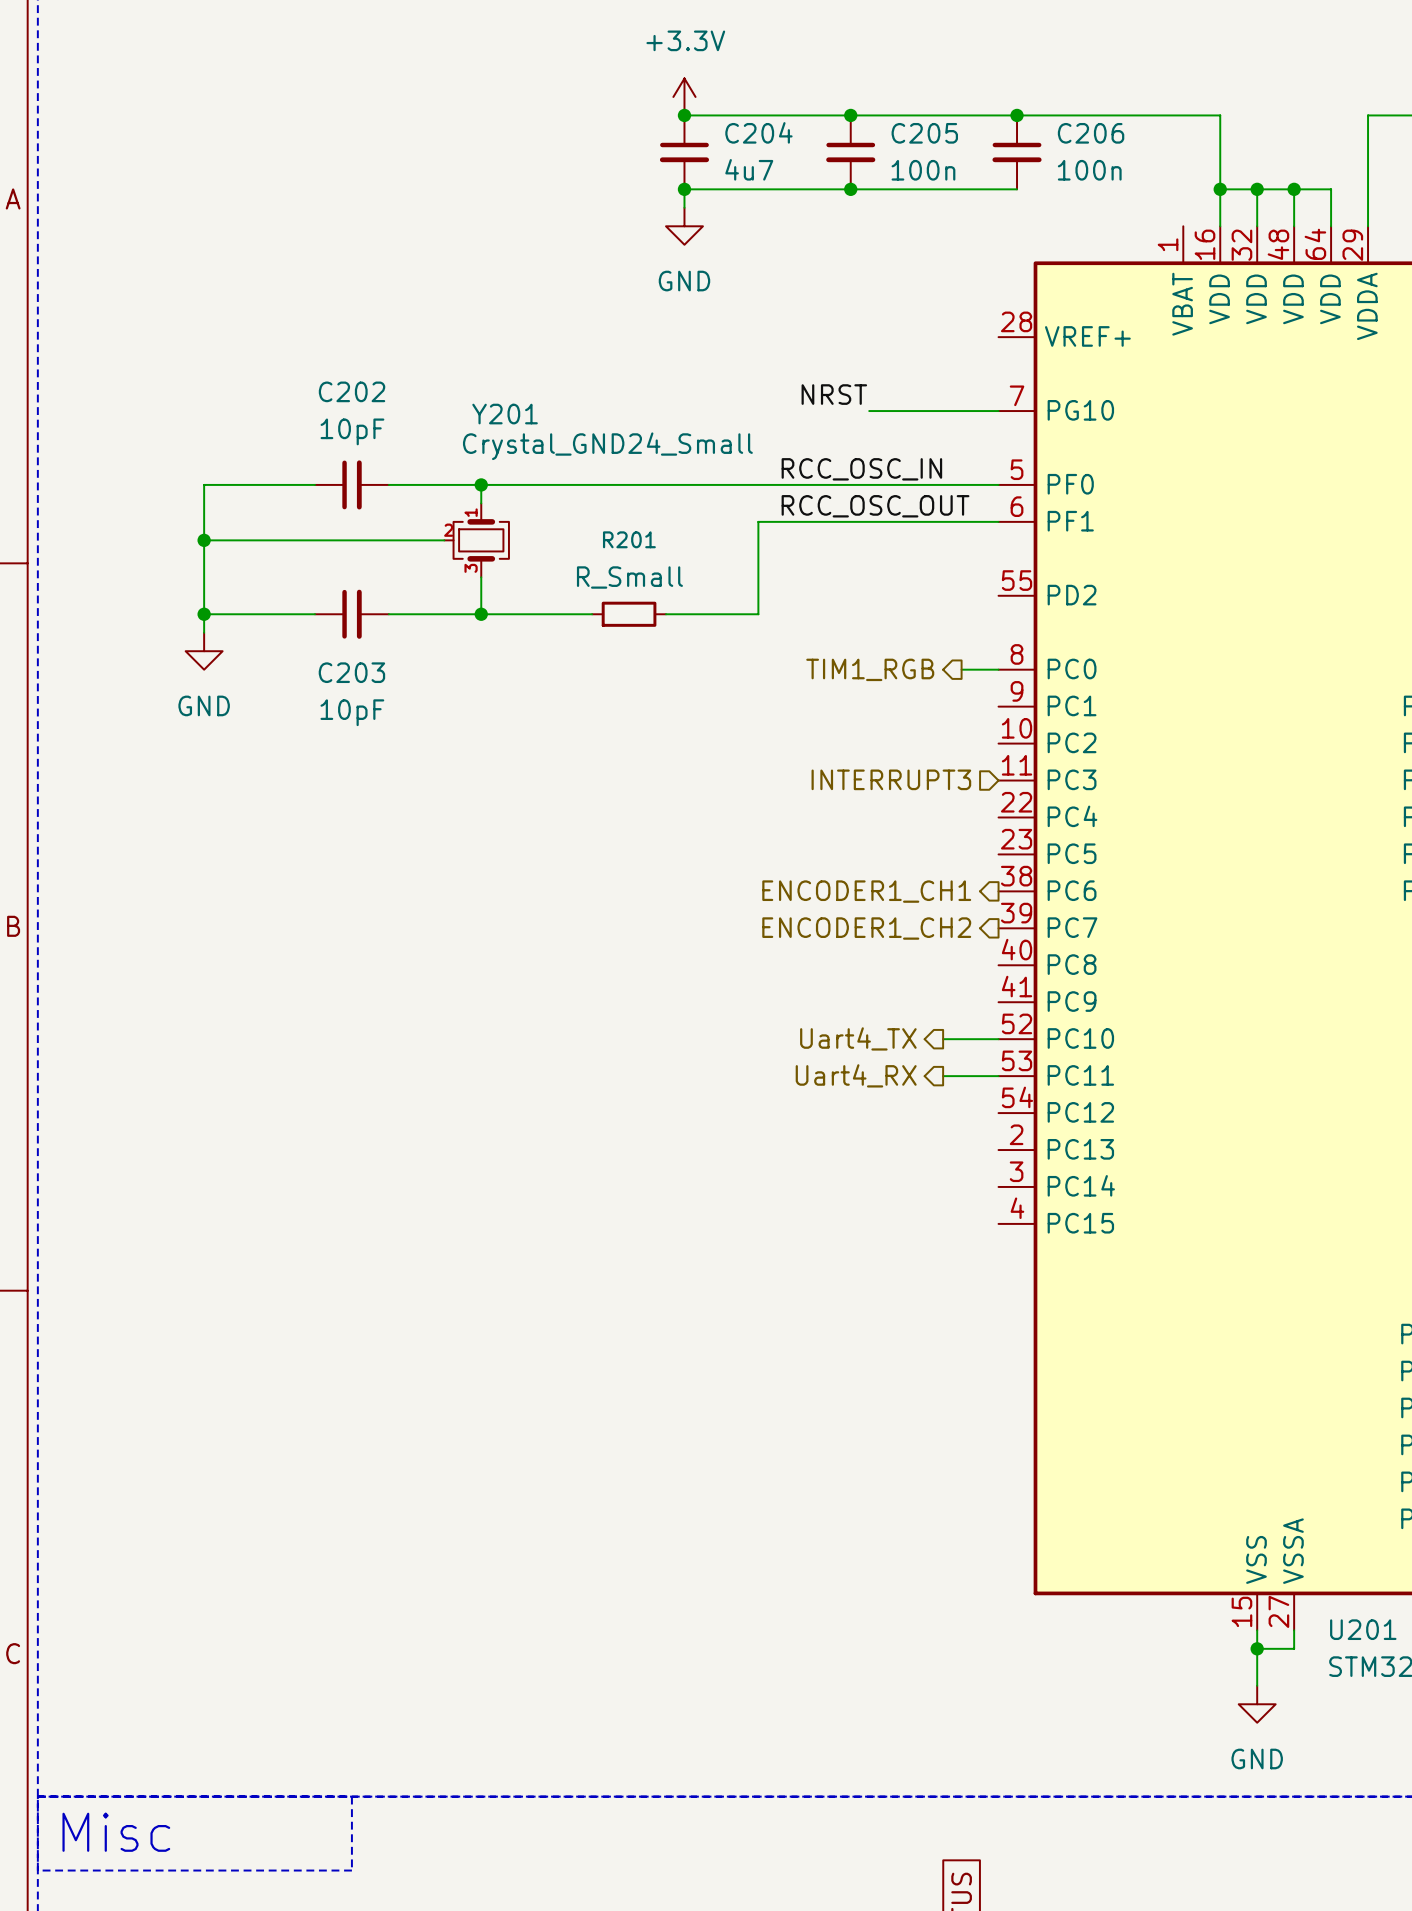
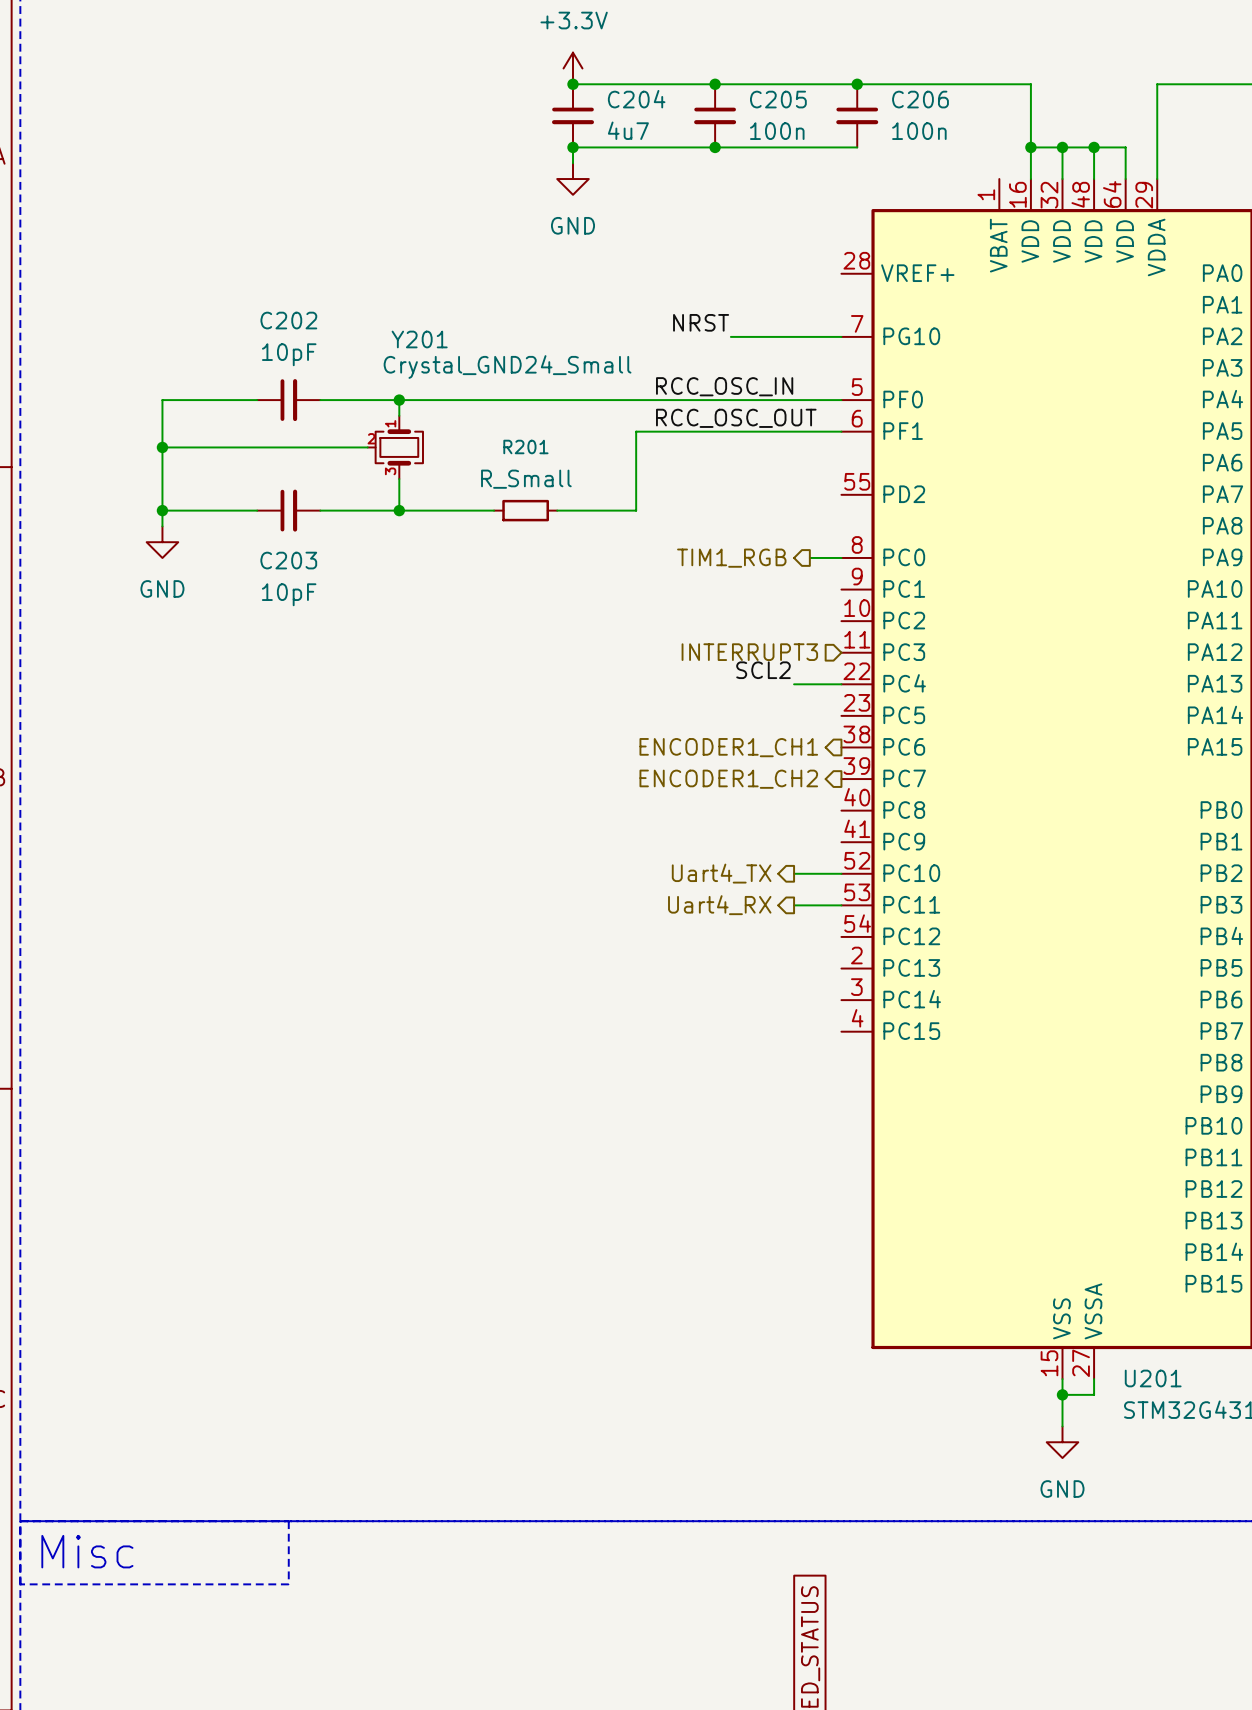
label: none -> SCL2 (763, 670)
wire: none -> (794, 684) (841, 684)

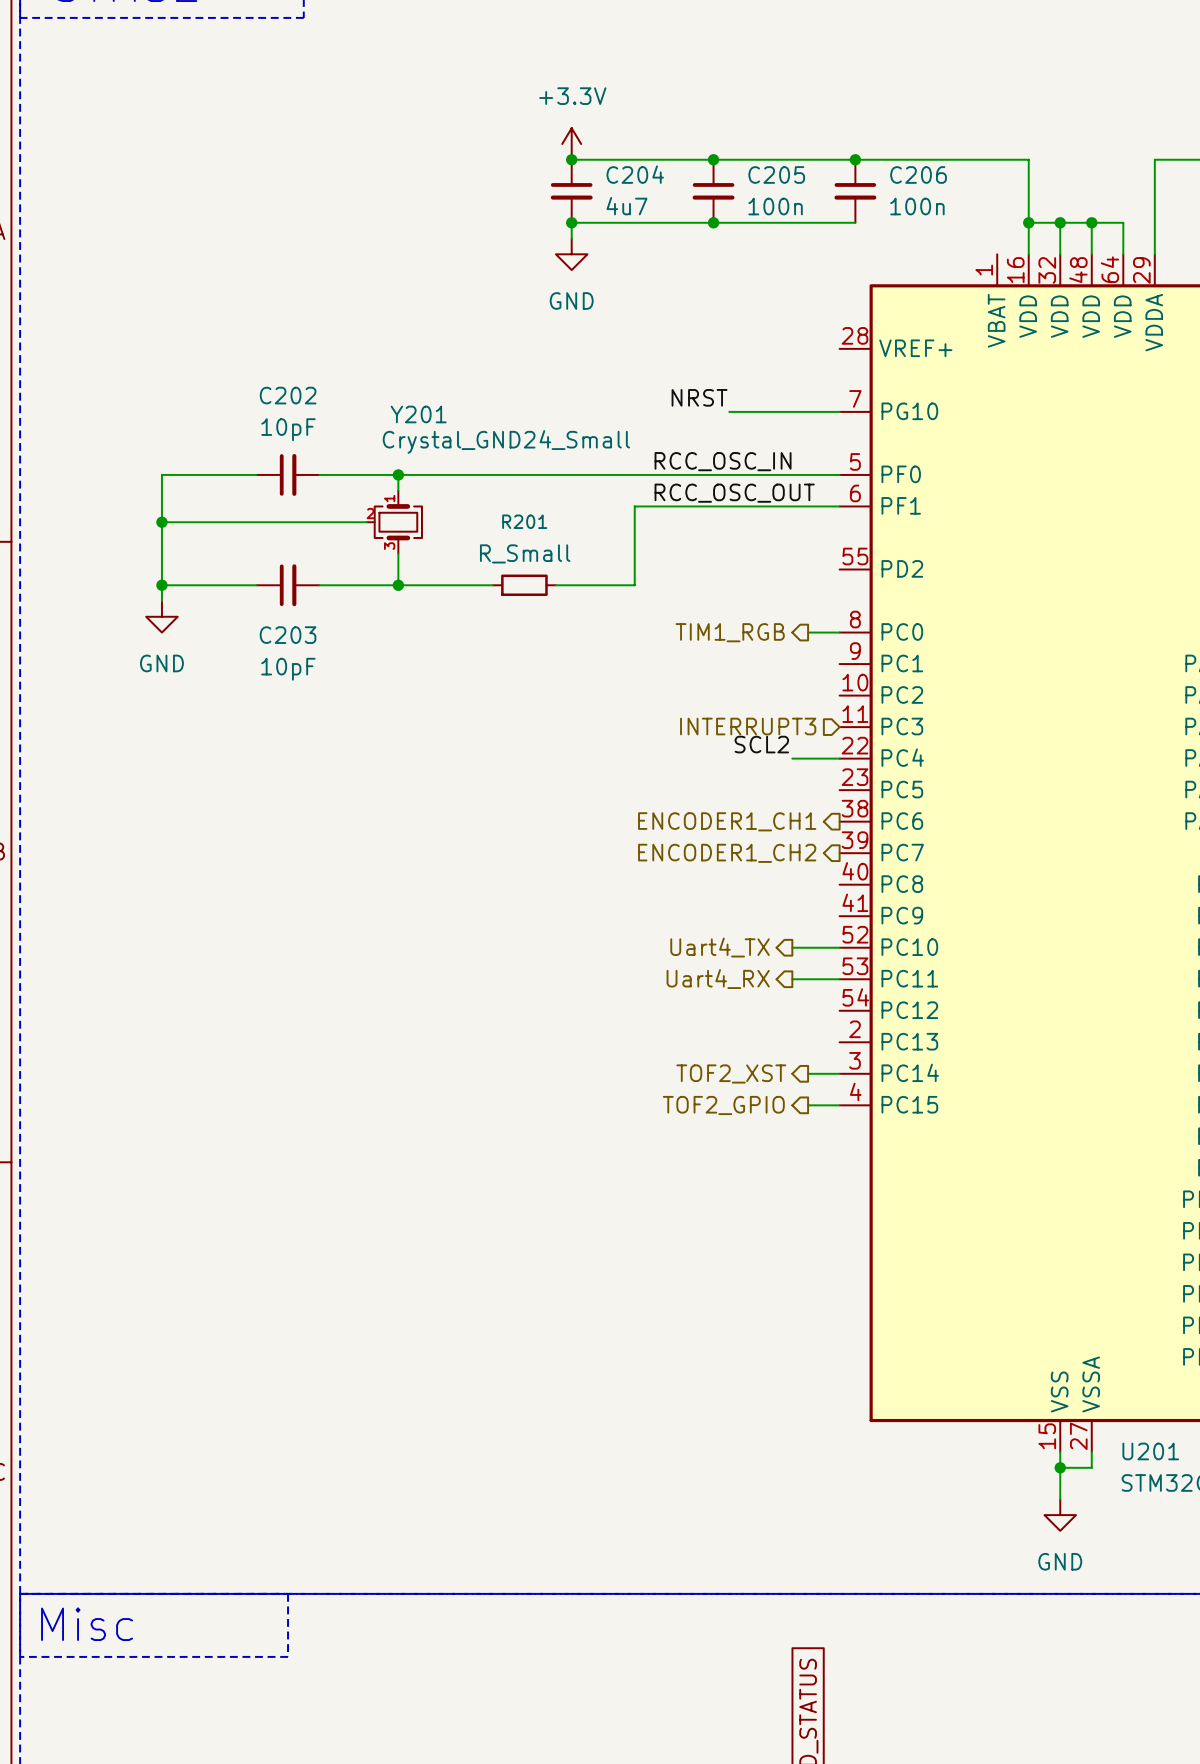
hierarchical label: none -> TOF2_XST (731, 1073)
wire: none -> (808, 1073) (839, 1073)
hierarchical label: none -> TOF2_GPIO (723, 1105)
wire: none -> (808, 1105) (839, 1105)

